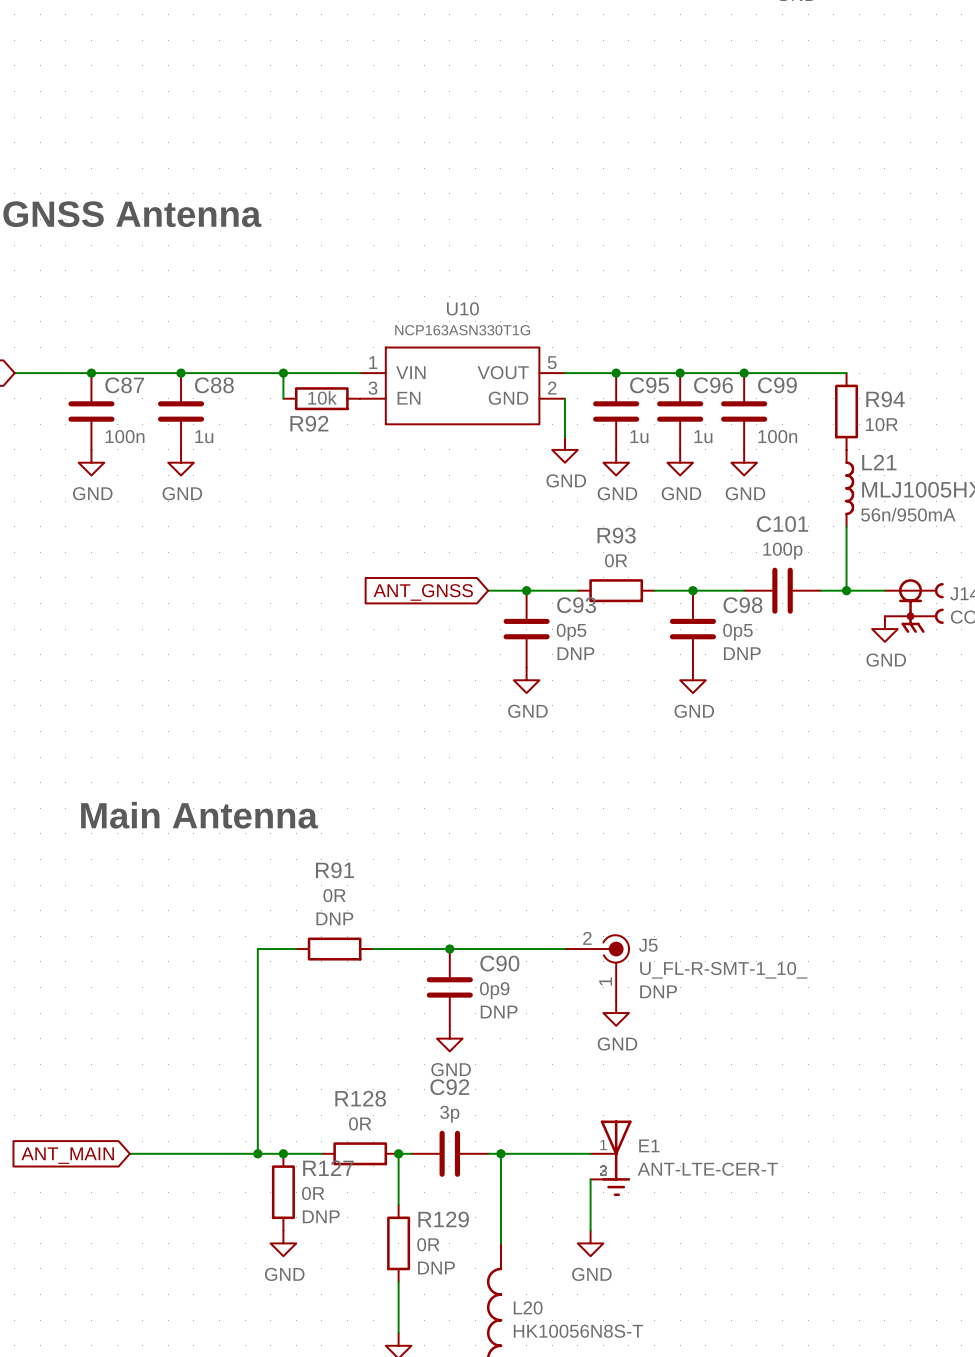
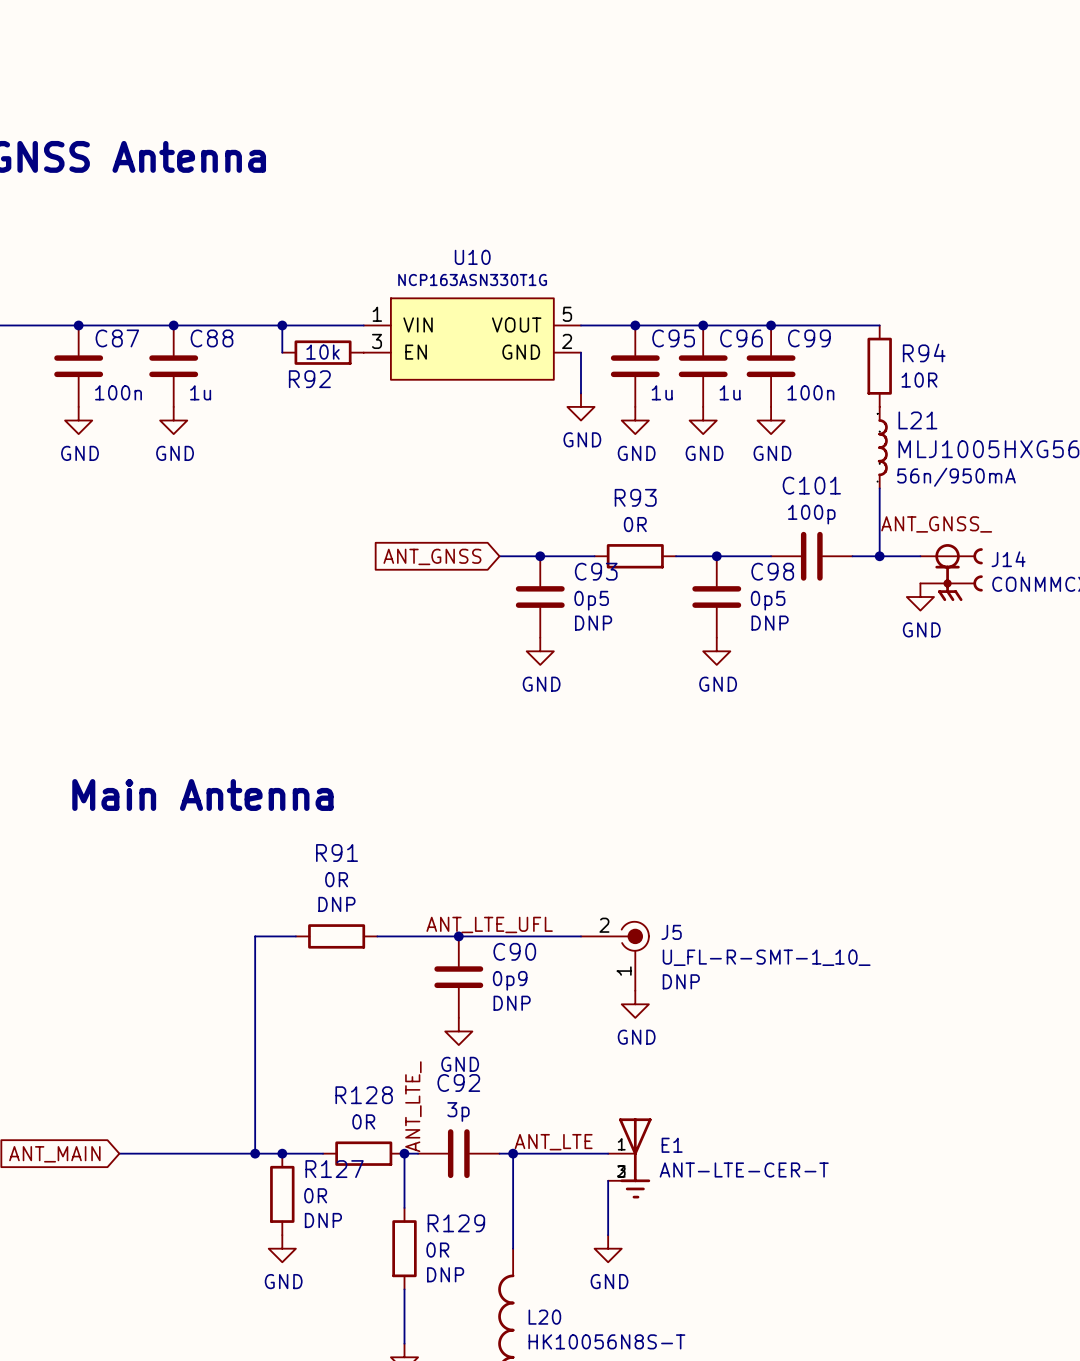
label: none -> ANT_GNSS_ (936, 524)
label: none -> ANT_LTE_UFL (489, 924)
label: none -> ANT_LTE_ (413, 1106)
label: none -> ANT_LTE (553, 1142)

